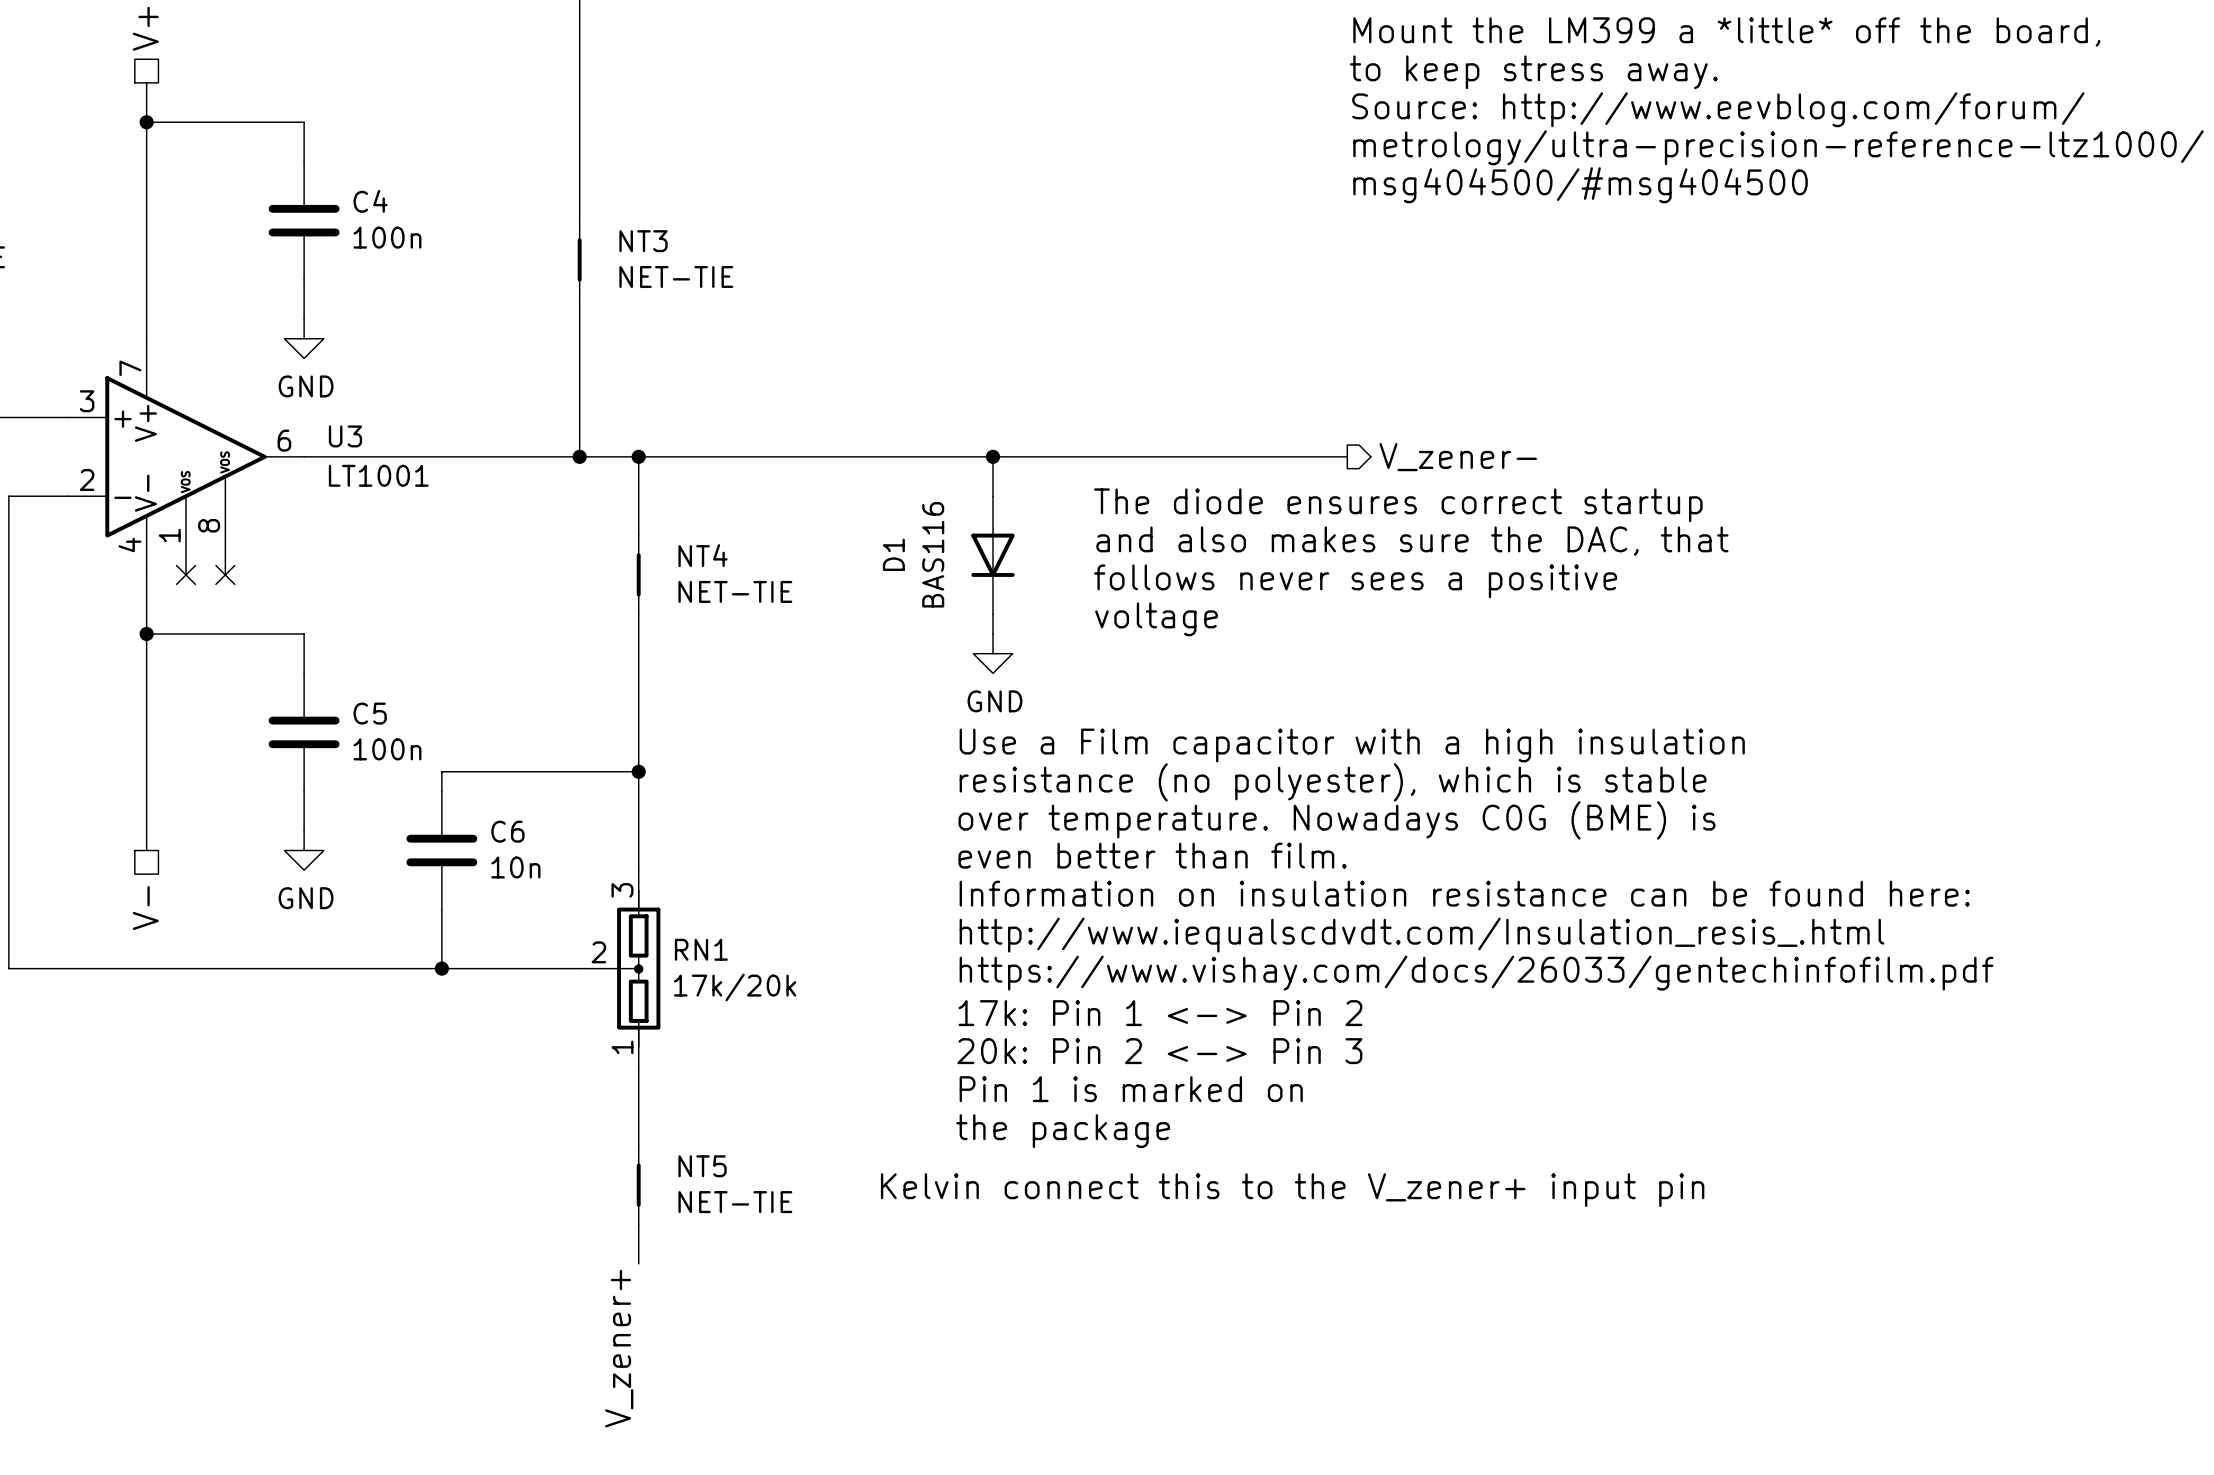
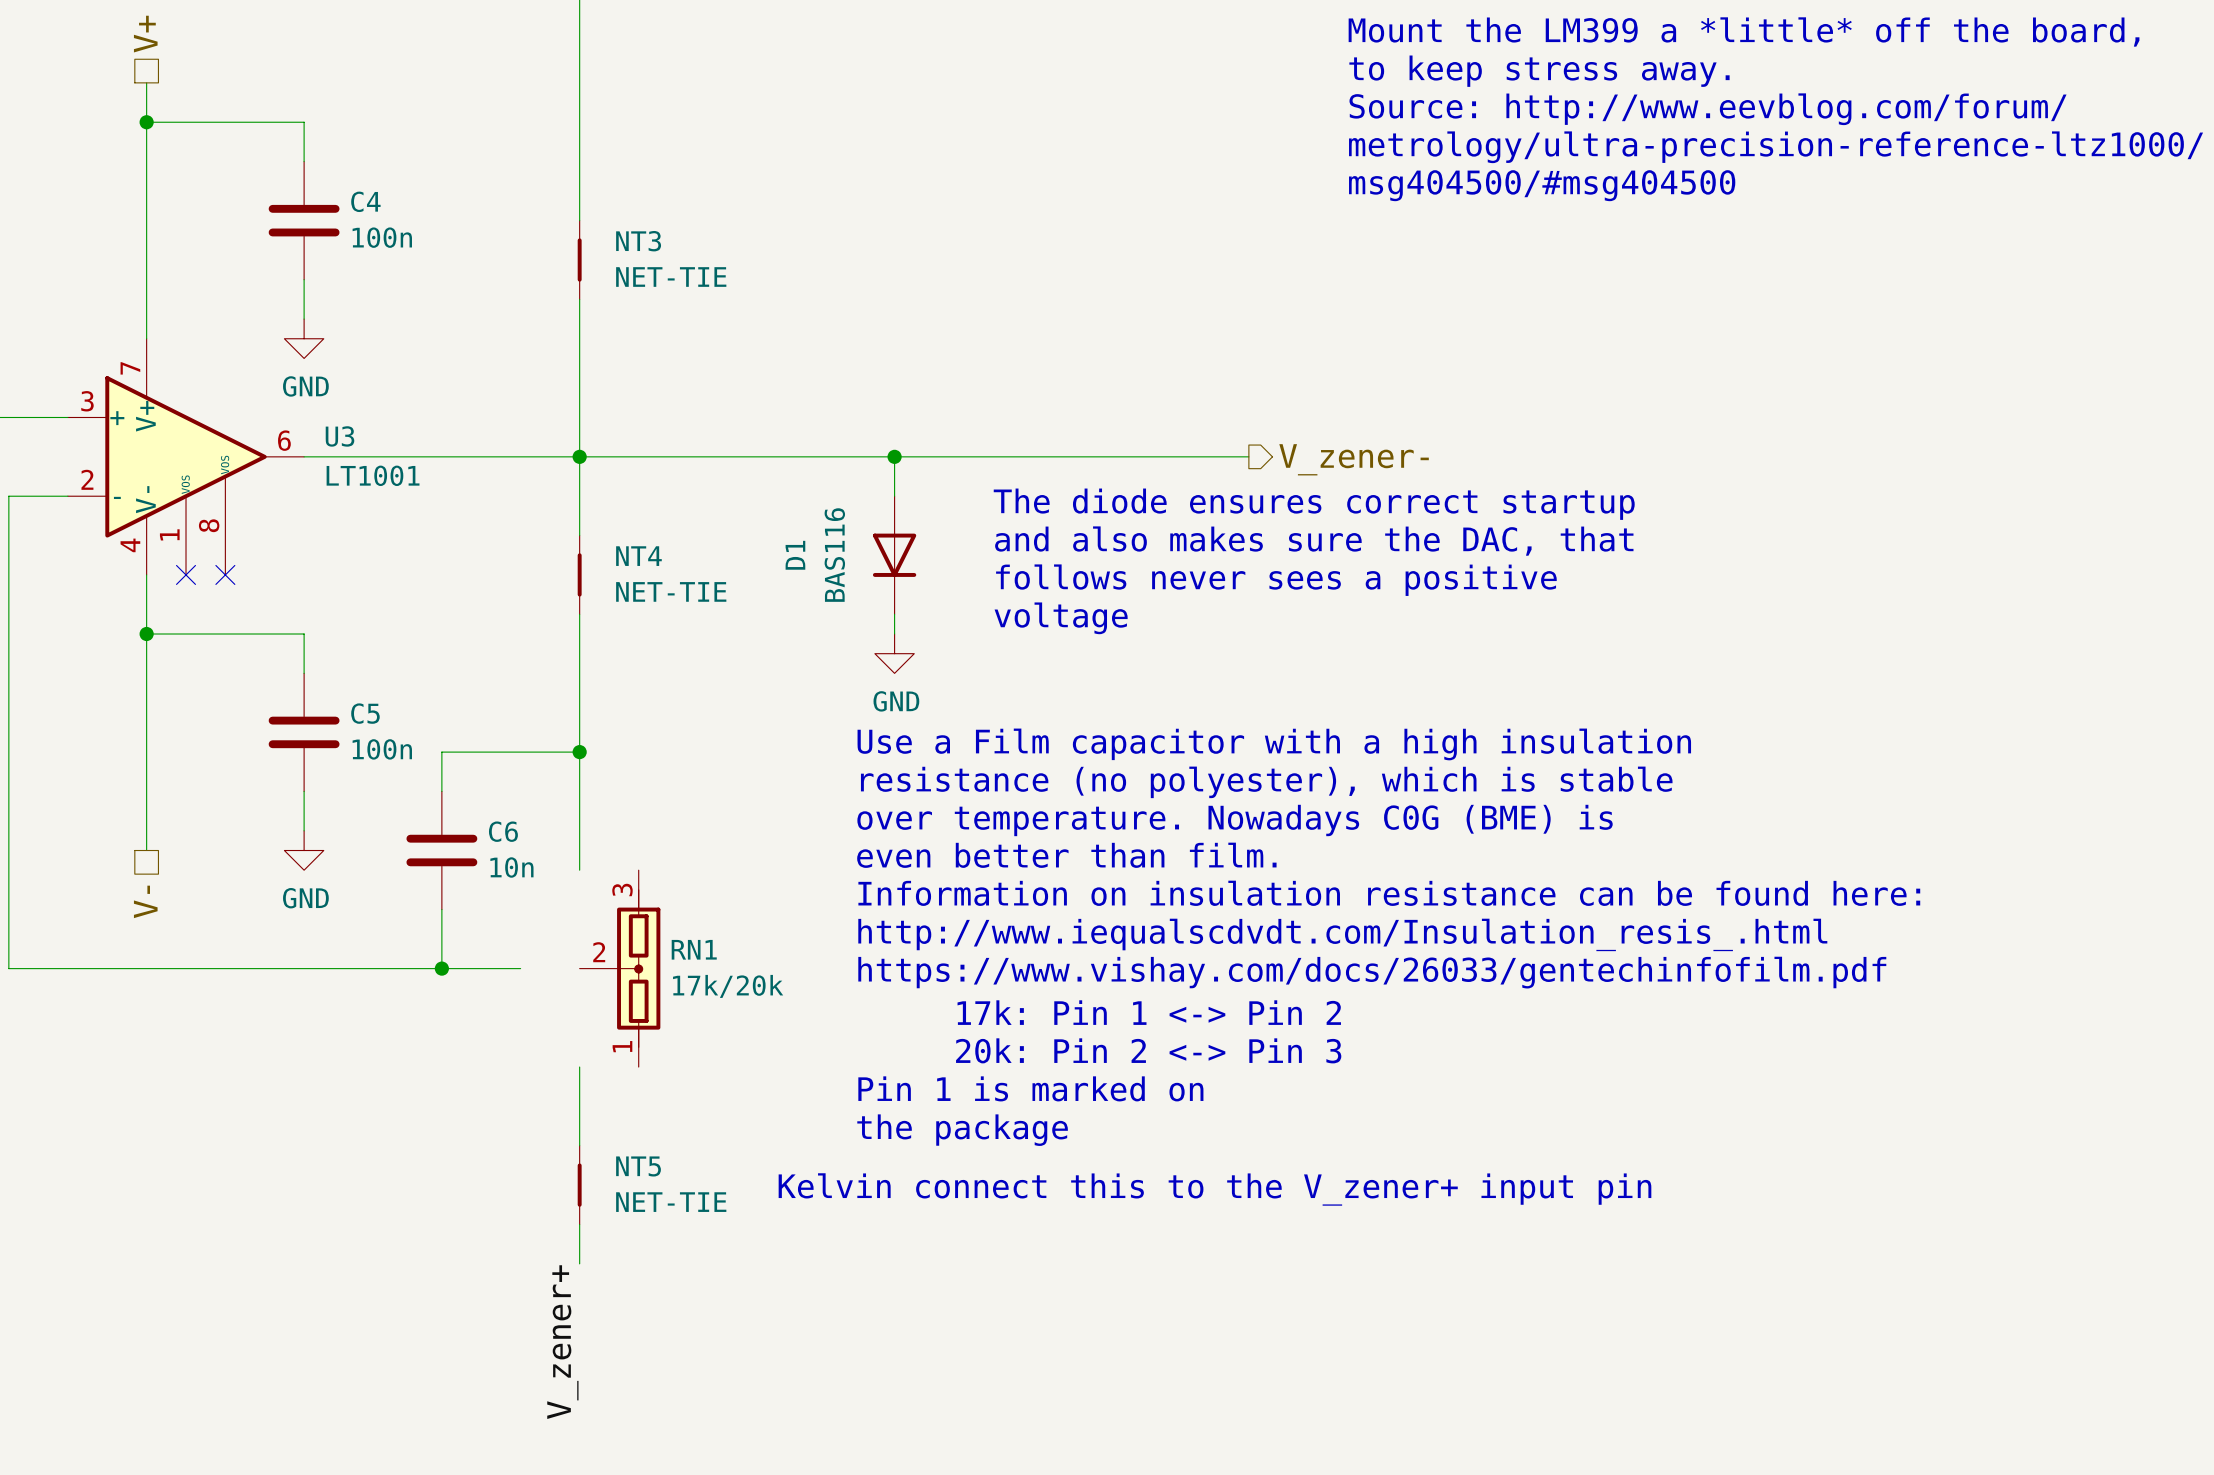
wire: (638, 456) (638, 535) -> (579, 456) (579, 535)
junction: (638, 456) -> none
junction: none -> (894, 456)
wire: (993, 456) (993, 496) -> (894, 456) (894, 496)
junction: (993, 456) -> none
wire: (1248, 456) (1347, 456) -> none
hierarchical label position: V_zener- (1458, 457) -> V_zener- (1354, 459)
text position: The diode ensures correct startup (1398, 505) -> The diode ensures correct startup (1314, 504)
text position: and also makes sure the DAC, that (1412, 541) -> and also makes sure the DAC, that (1314, 541)
D1 position: (993, 555) -> (894, 555)
NT4 position: (638, 574) -> (579, 574)
text position: follows never sees a positive (1355, 581) -> follows never sees a positive (1276, 580)
wire: (638, 614) (638, 870) -> (579, 614) (579, 870)
wire: (993, 614) (993, 634) -> (894, 614) (894, 634)
text position: voltage (1156, 619) -> voltage (1061, 618)
power symbol position: GND (993, 653) -> GND (894, 653)
text position: Use a Film capacitor with a high insulation (1352, 745) -> Use a Film capacitor with a high insulation (1274, 744)
wire: (441, 771) (638, 771) -> (441, 771) (441, 752) (579, 752)
junction position: (638, 771) -> (579, 752)
text position: resistance (no polyester), which is stable (1333, 782) -> resistance (no polyester), which is stable (1266, 782)
text position: over temperature. Nowadays C0G (BME) is (1337, 820) -> over temperature. Nowadays C0G (BME) is (1235, 820)
text position: even better than film. (1152, 855) -> even better than film. (1066, 855)
text position: Information on insulation resistance can be found here: (1464, 893) -> Information on insulation resistance can be found here: (1389, 893)
text position: http://www.iequalscdvdt.com/Insulation_resis_.html (1421, 935) -> http://www.iequalscdvdt.com/Insulation_resis_.html (1342, 934)
wire: (520, 968) (579, 968) -> none
text position: https://www.vishay.com/docs/26033/gentechinfofilm.pdf (1476, 973) -> https://www.vishay.com/docs/26033/gentechinfofilm.pdf (1372, 972)
wire: (638, 1067) (638, 1145) -> (579, 1067) (579, 1145)
text position: Pin 1 is marked on (1131, 1089) -> Pin 1 is marked on (1030, 1088)
text position: the package (1063, 1131) -> the package (962, 1130)
NT5 position: (638, 1185) -> (579, 1185)
text position: Kelvin connect this to the V_zener+ input pin (1292, 1190) -> Kelvin connect this to the V_zener+ input pin (1214, 1189)
wire: (638, 1224) (638, 1263) -> (579, 1224) (579, 1263)
label position: V_zener+ (619, 1348) -> V_zener+ (562, 1342)

